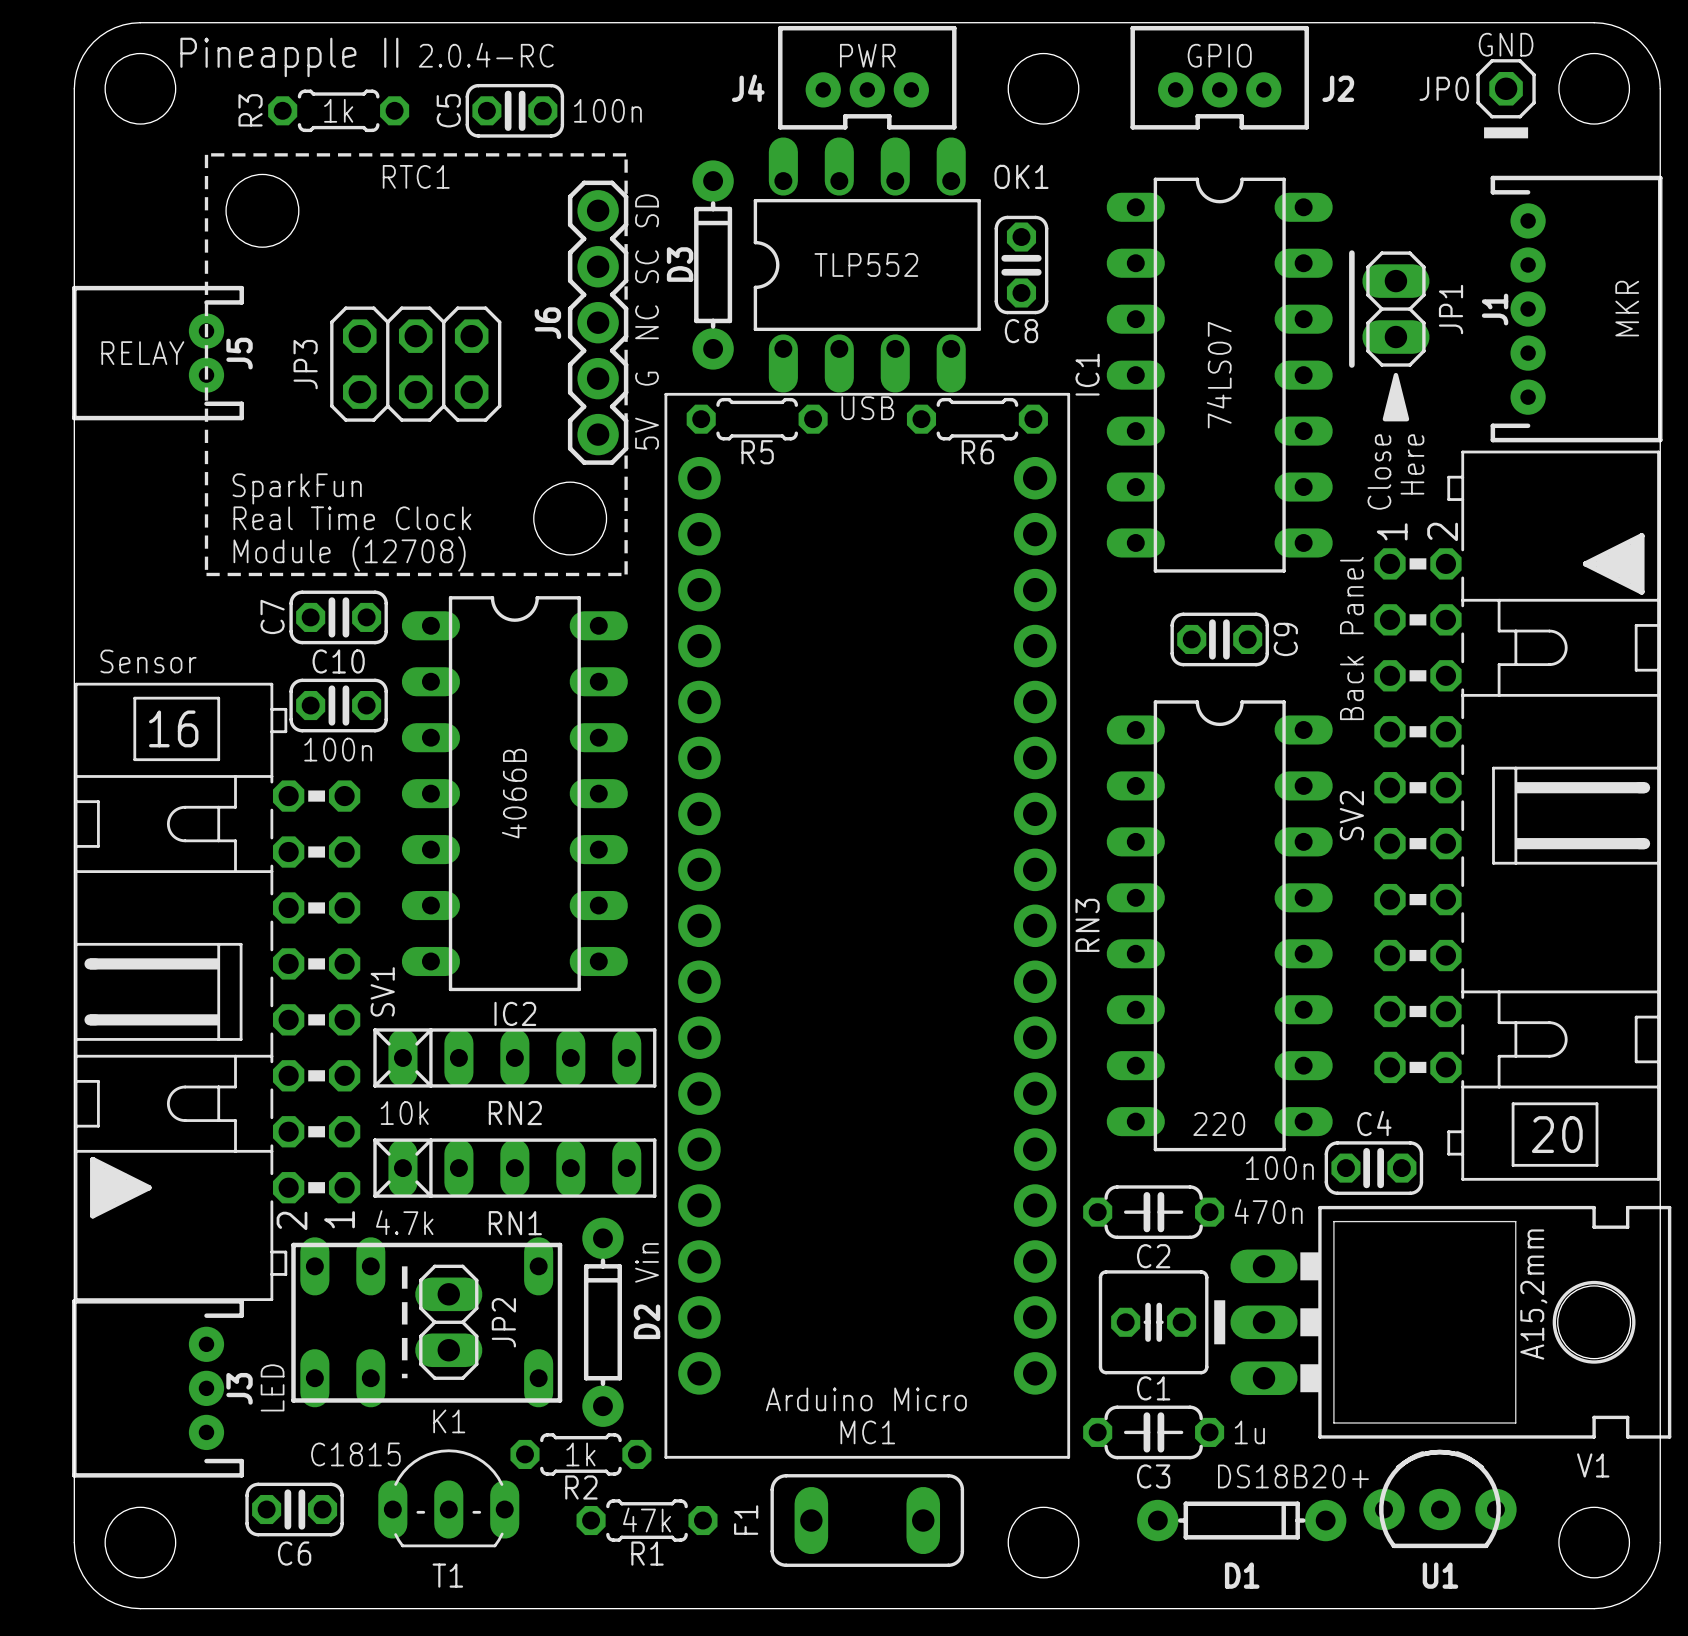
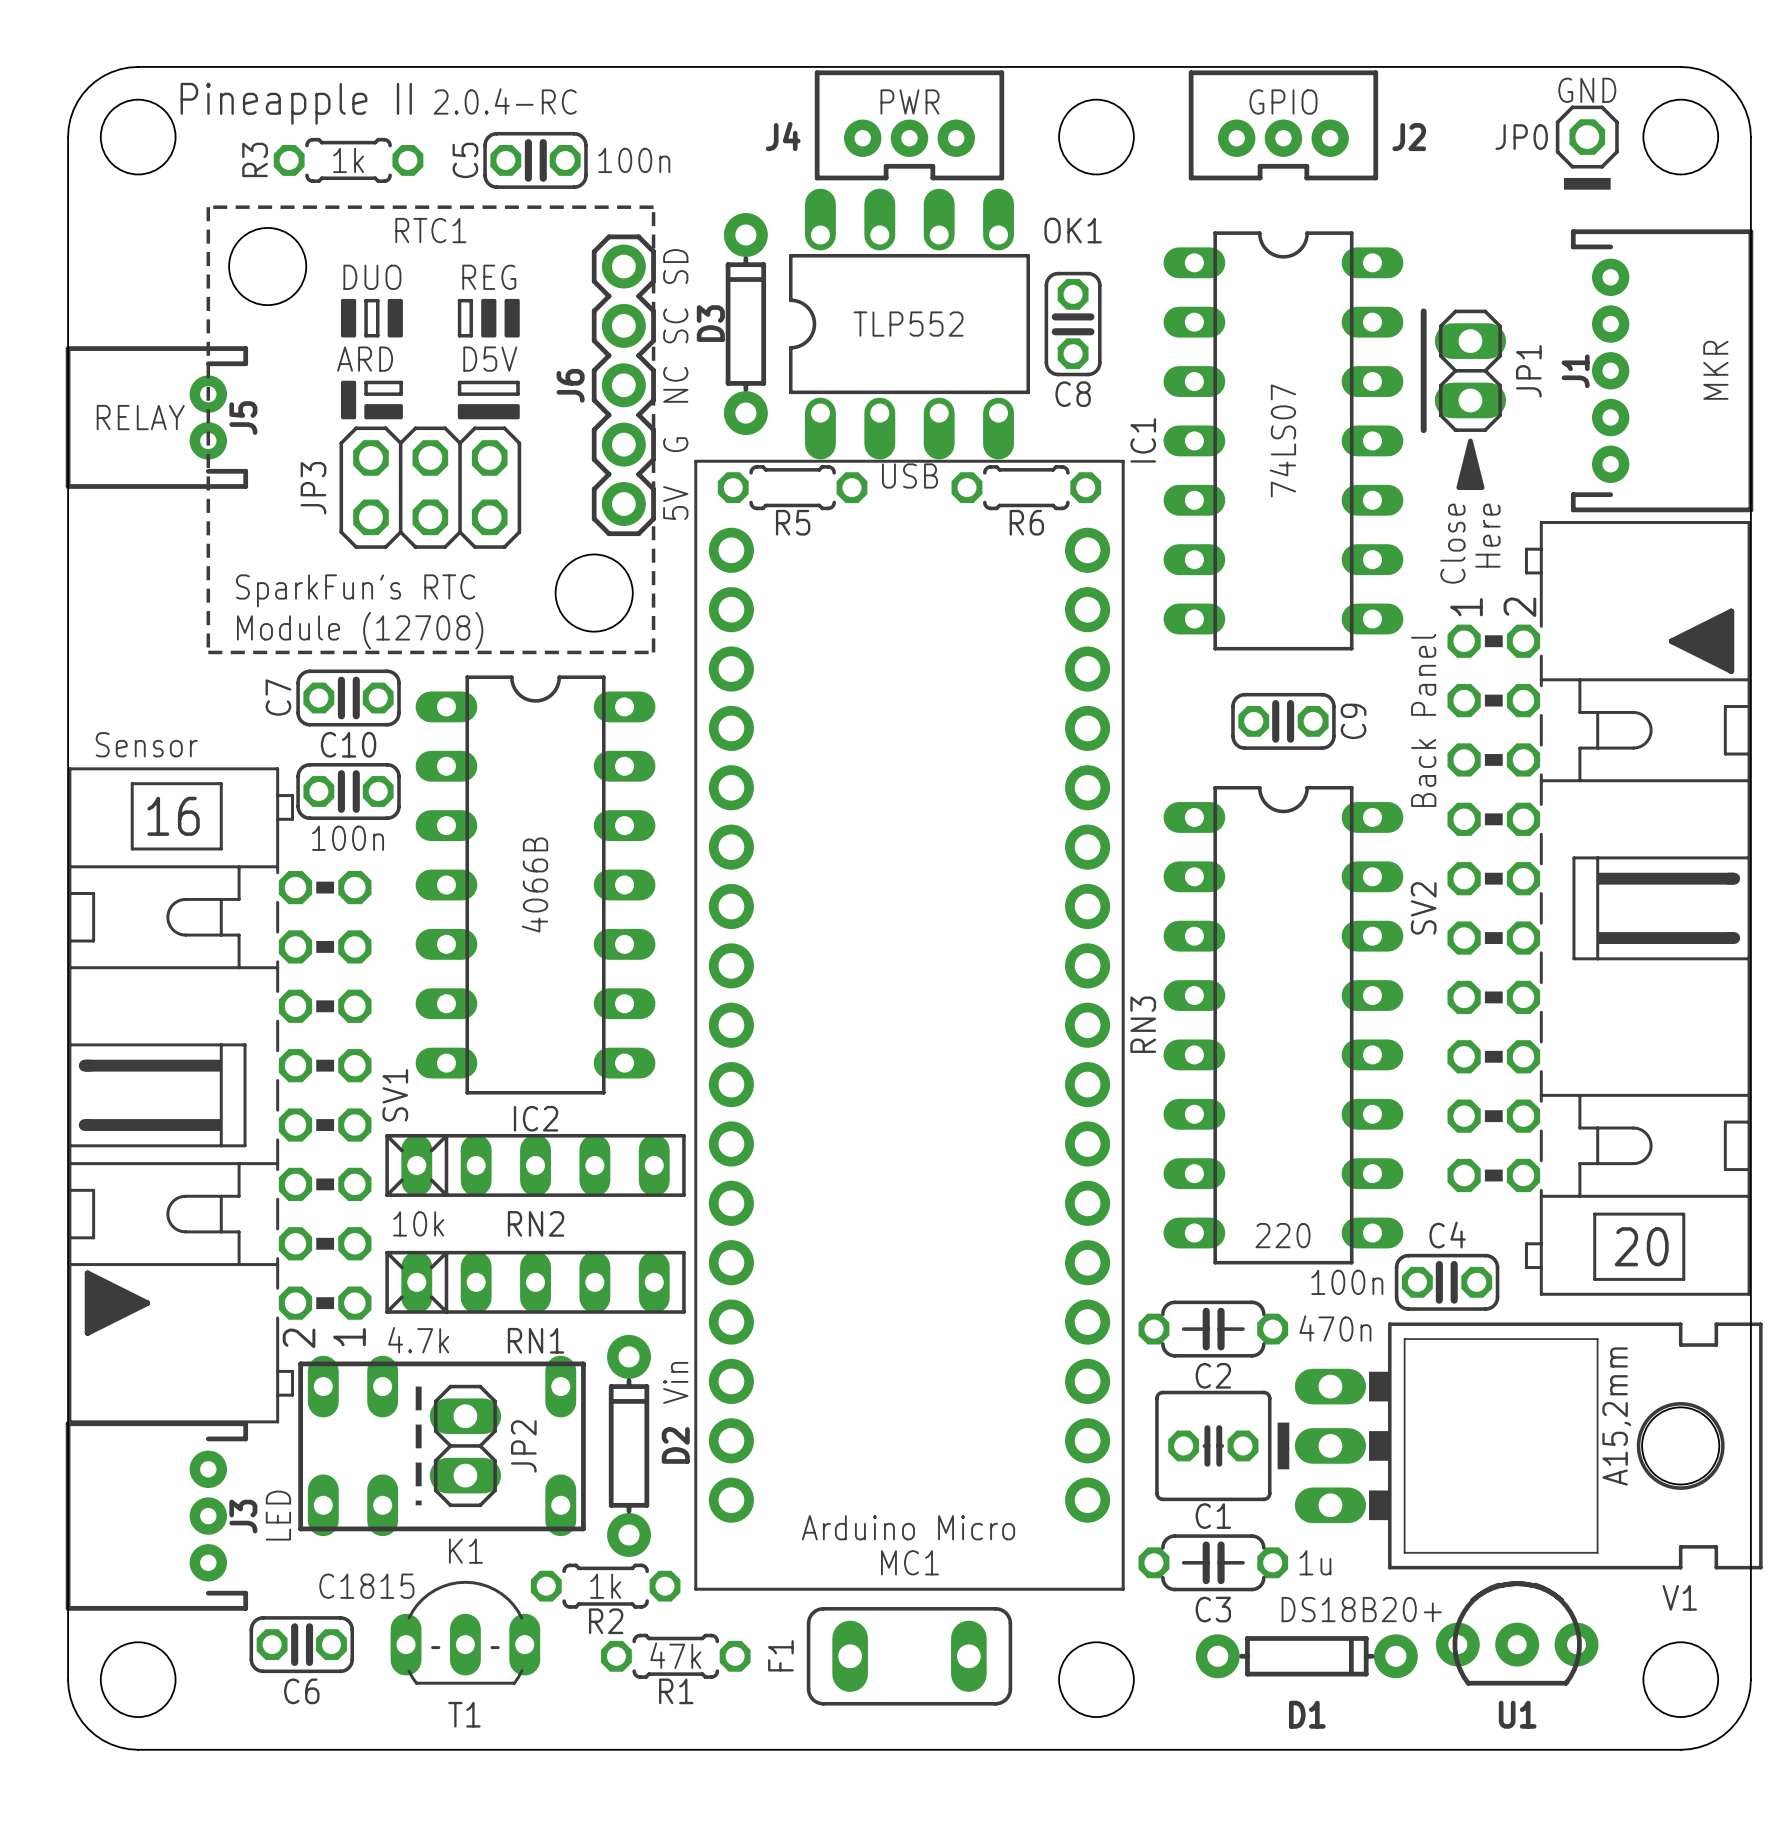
text: none -> DUO (372, 277)
text: none -> REG (489, 277)
drawing: none -> [340, 298, 357, 338]
drawing: none -> [387, 298, 403, 338]
drawing: none -> [481, 298, 520, 338]
line: none -> (366, 300) (366, 335) (377, 335) (377, 300) (366, 300)
line: none -> (459, 300) (471, 300) (471, 335) (459, 335) (459, 300)
text: none -> ARD (365, 359)
text: none -> D5V (490, 359)
drawing: none -> [340, 380, 403, 420]
line: none -> (366, 382) (366, 394) (401, 394) (401, 382) (366, 382)
line: none -> (459, 382) (517, 382) (517, 394) (459, 394) (459, 382)
drawing: none -> [457, 404, 520, 420]
JP3 position: (415, 364) -> (430, 487)
text: SparkFun (297, 488) -> none
text: Real Time Clock (352, 518) -> SparkFun's RTC (355, 590)

